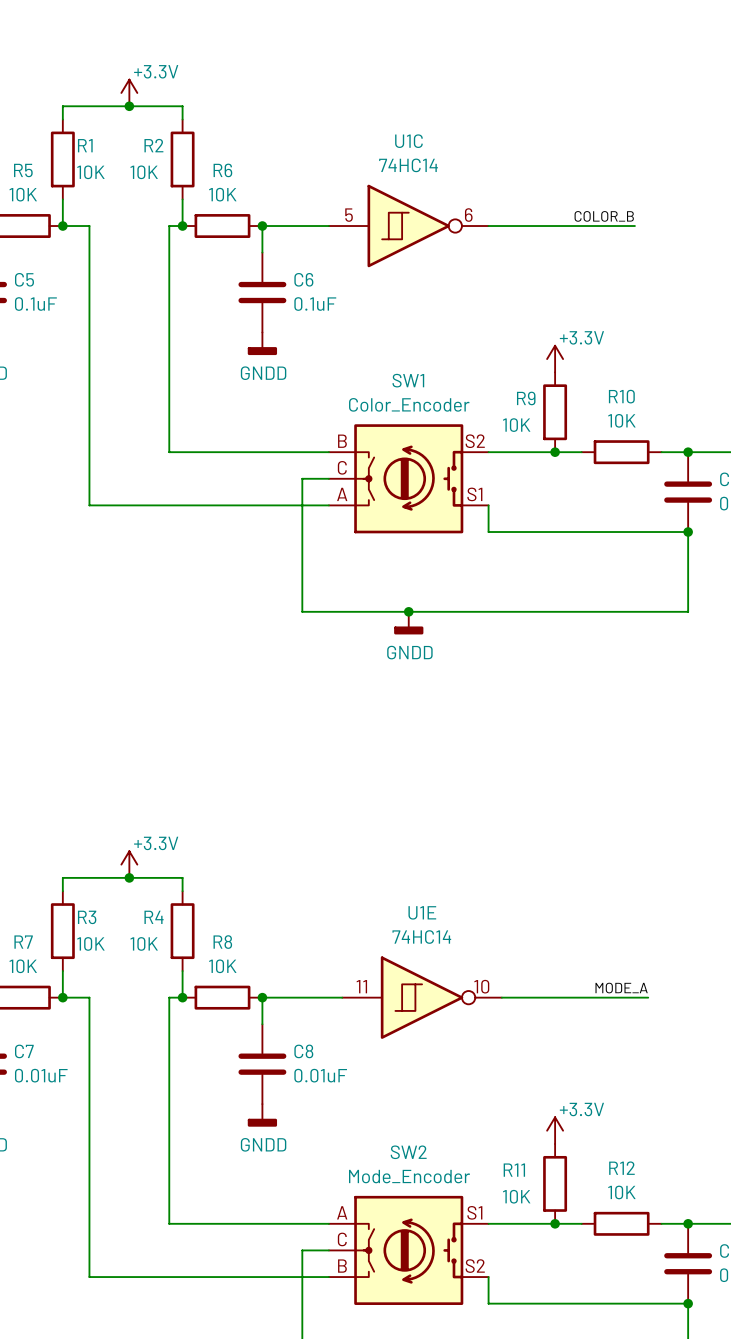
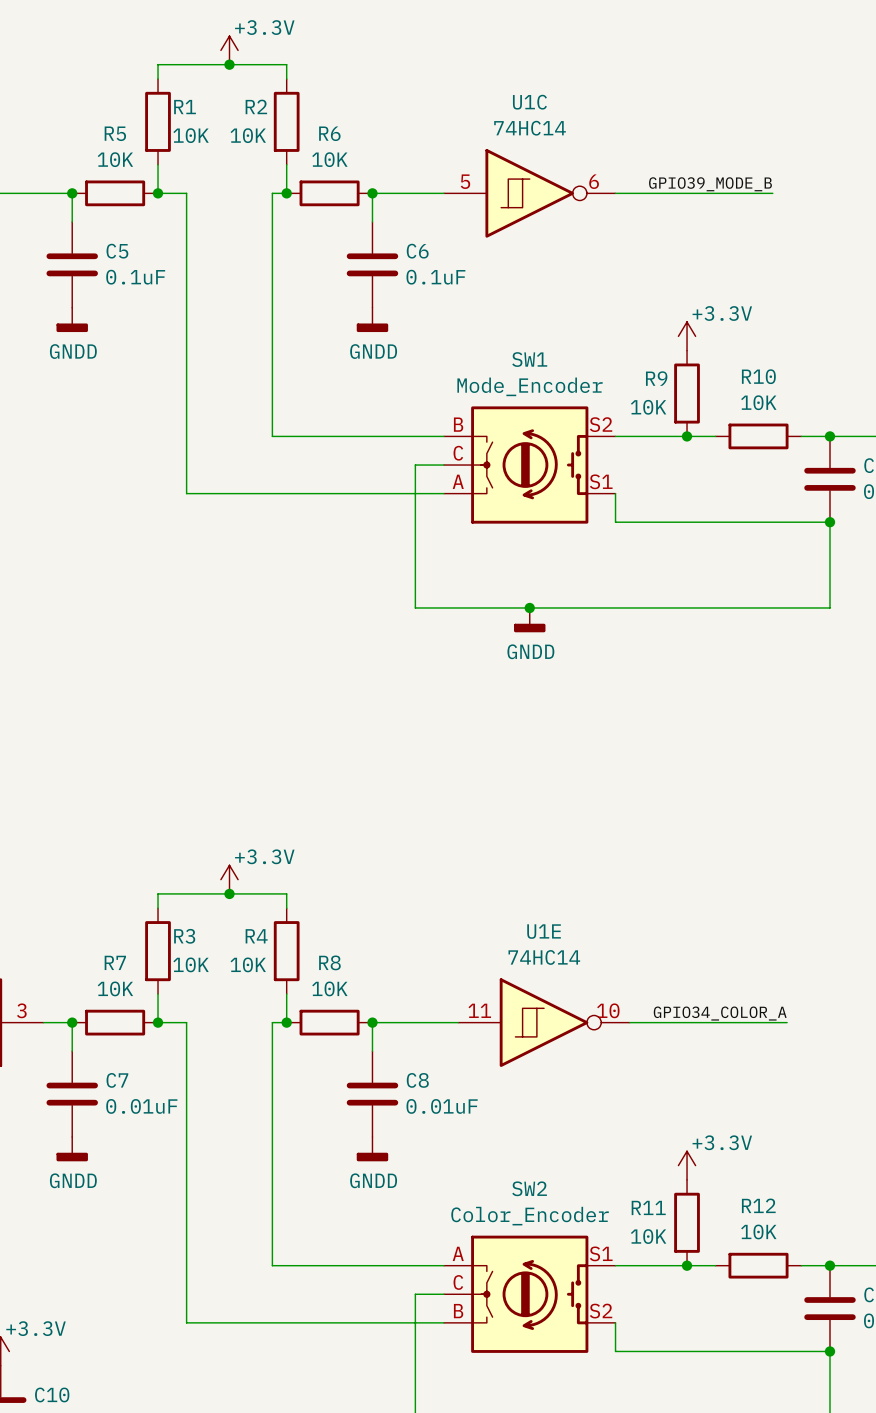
label: COLOR_B (604, 216) -> GPIO39_MODE_B (710, 184)
SW1 value: Color_Encoder (409, 404) -> Mode_Encoder (530, 386)
label: MODE_A (621, 988) -> GPIO34_COLOR_A (720, 1013)
SW2 value: Mode_Encoder (409, 1176) -> Color_Encoder (530, 1216)

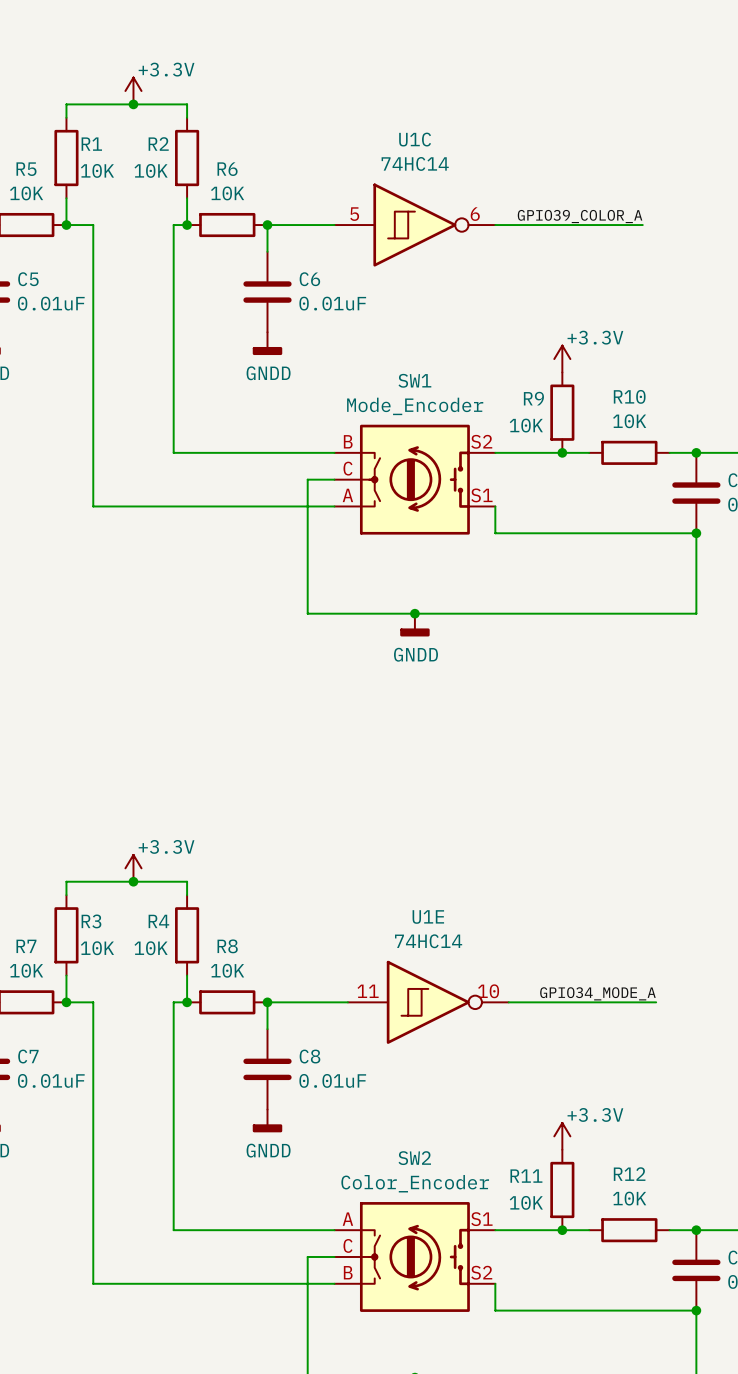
label: GPIO39_MODE_B (710, 184) -> GPIO39_COLOR_A (580, 216)
C5 value: 0.1uF (135, 277) -> 0.01uF (51, 303)
C6 value: 0.1uF (435, 277) -> 0.01uF (332, 303)
label: GPIO34_COLOR_A (720, 1013) -> GPIO34_MODE_A (597, 993)

